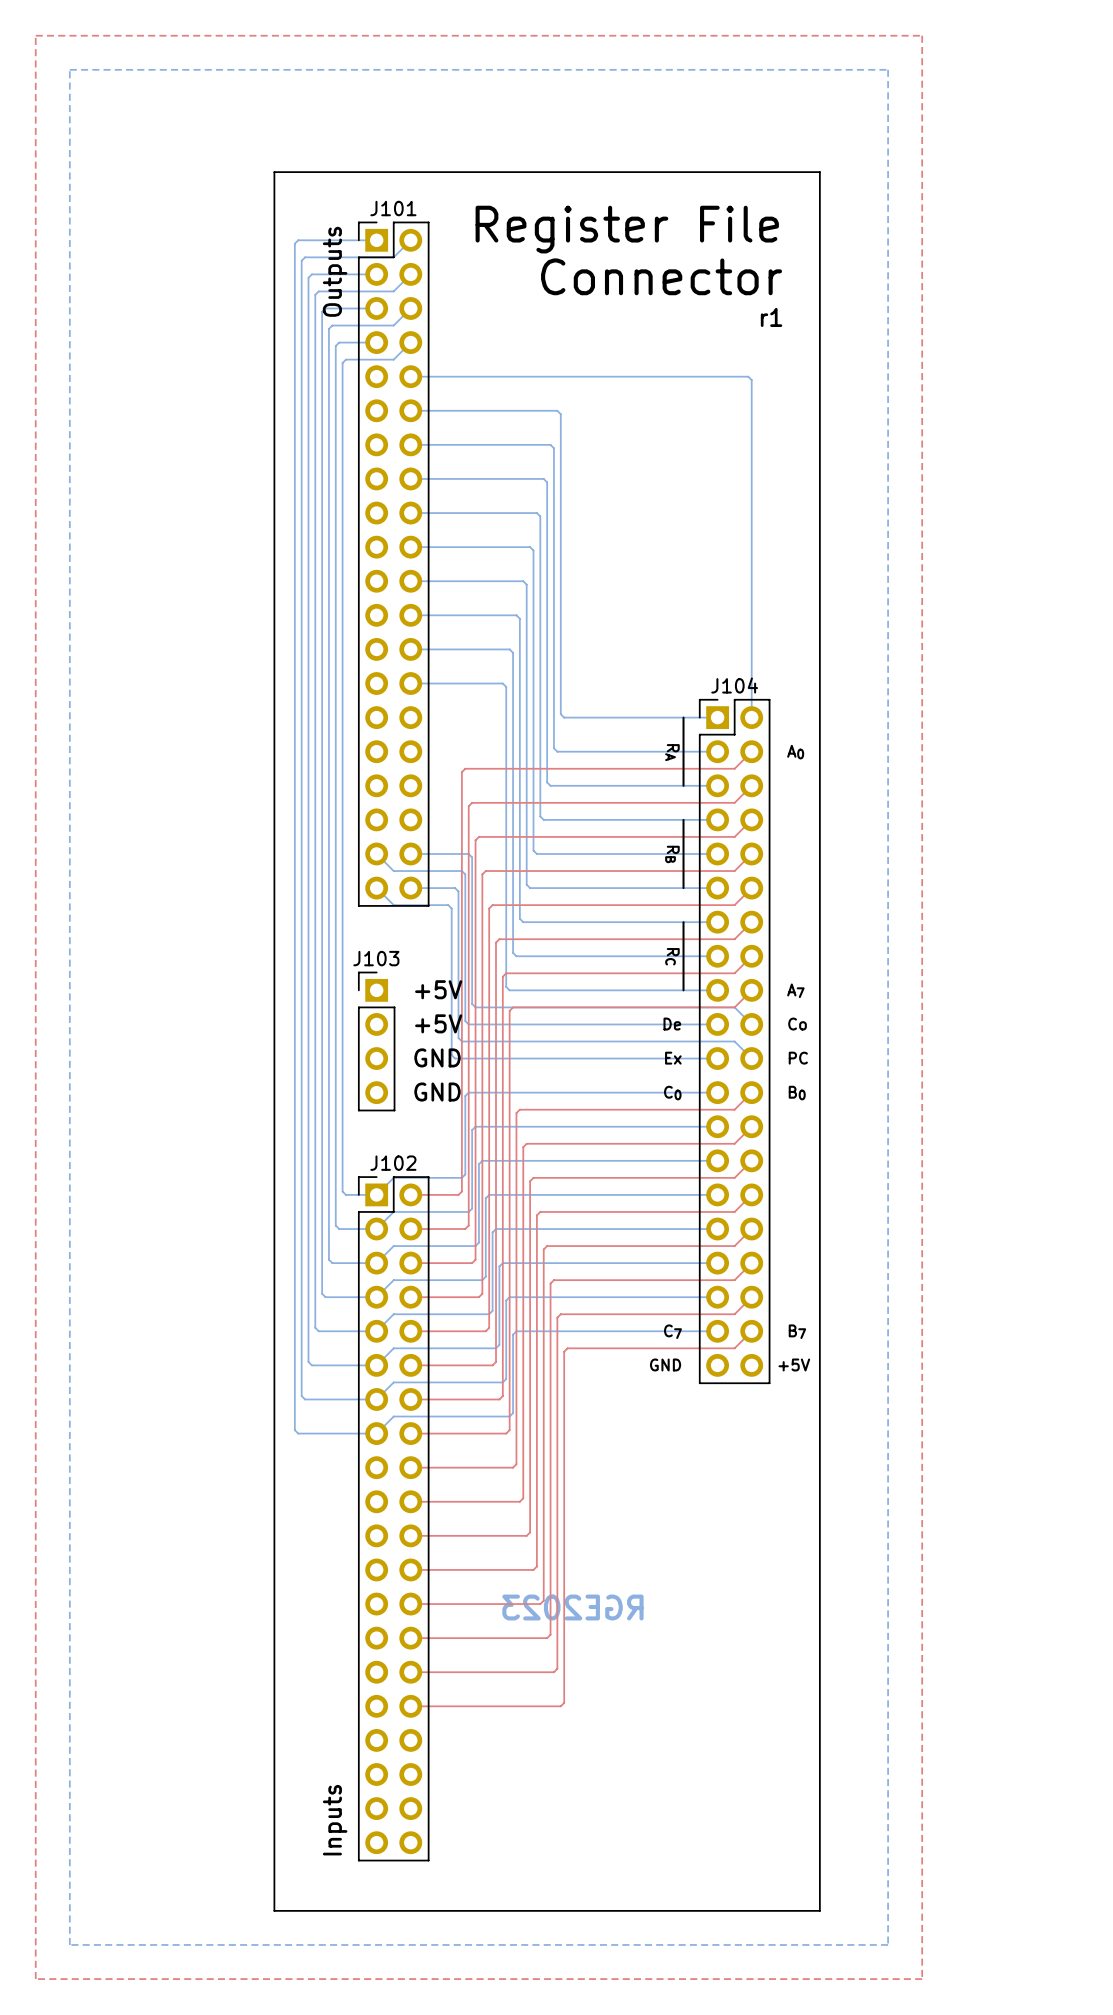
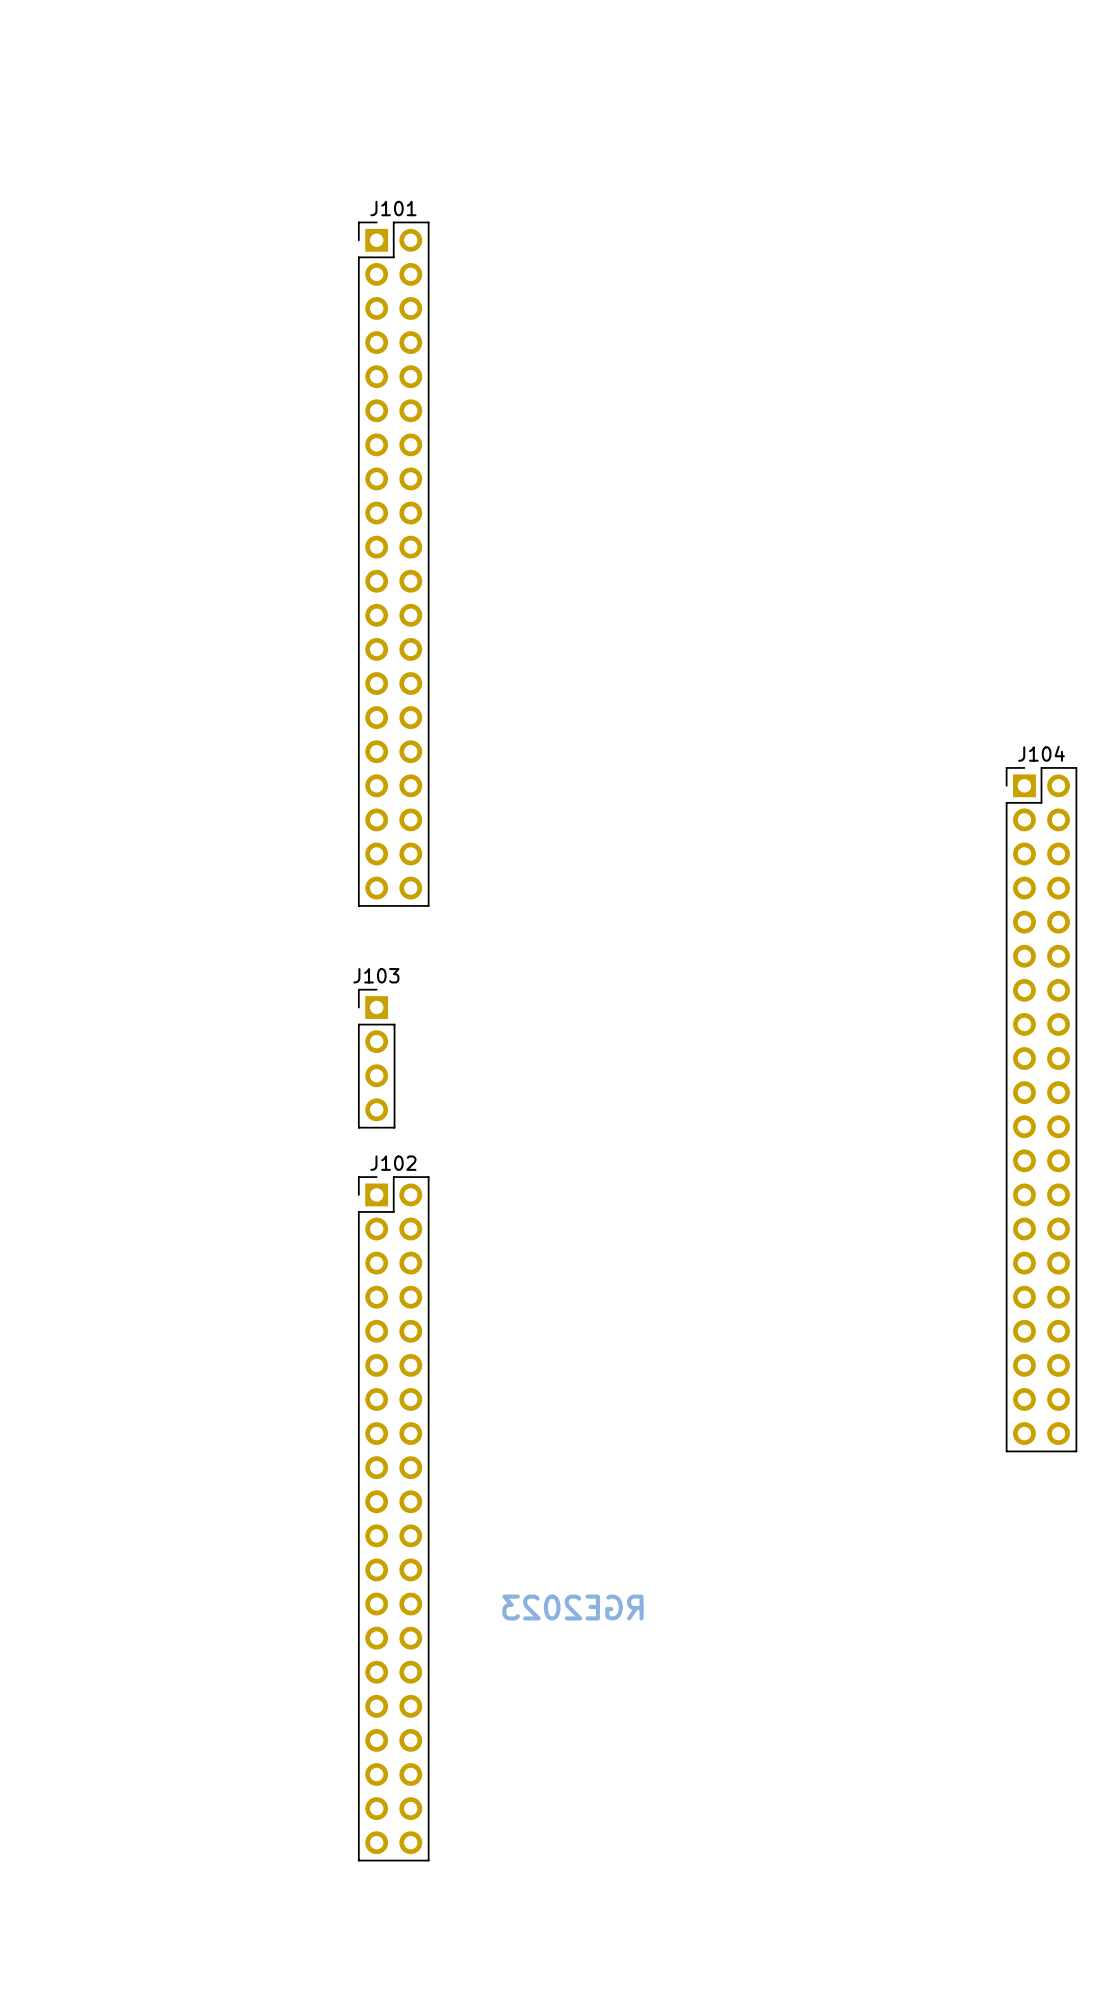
top zone outline: (35, 35) (922, 35) (922, 1979) (35, 1979) (35, 35) -> none
bottom zone outline: (69, 69) (888, 69) (888, 1944) (69, 1944) (69, 69) -> none
board edge: (274, 172) (819, 172) (819, 1910) (274, 1910) (274, 172) -> none
text: Register File (627, 229) -> none
bottom track: (376, 240) (298, 240) (294, 243) (294, 1430) (298, 1433) (376, 1433) (393, 1416) (509, 1416) (513, 1413) (513, 1334) (516, 1331) (717, 1331) -> none
bottom track: (410, 240) (393, 257) (305, 257) (301, 260) (301, 1396) (305, 1399) (376, 1399) (393, 1382) (502, 1382) (506, 1379) (506, 1300) (509, 1297) (717, 1297) -> none
text: Outputs (335, 271) -> none
bottom track: (376, 274) (311, 274) (308, 277) (308, 1361) (311, 1365) (376, 1365) (393, 1348) (496, 1348) (499, 1344) (499, 1266) (502, 1263) (717, 1263) -> none
bottom track: (410, 274) (393, 291) (318, 291) (315, 294) (315, 1327) (318, 1331) (376, 1331) (393, 1314) (489, 1314) (492, 1310) (492, 1232) (496, 1229) (717, 1229) -> none
text: Connector (661, 276) -> none
bottom track: (376, 308) (325, 308) (322, 311) (322, 1293) (325, 1297) (376, 1297) (393, 1280) (482, 1280) (485, 1276) (485, 1198) (489, 1194) (717, 1194) -> none
bottom track: (410, 308) (393, 325) (332, 325) (328, 328) (328, 1259) (332, 1263) (376, 1263) (393, 1246) (475, 1246) (478, 1242) (478, 1164) (482, 1160) (717, 1160) -> none
text: r1 (771, 317) -> none
bottom track: (376, 342) (339, 342) (335, 345) (335, 1225) (339, 1229) (376, 1229) (393, 1211) (468, 1211) (472, 1208) (472, 1130) (475, 1126) (717, 1126) -> none
bottom track: (410, 342) (393, 359) (345, 359) (342, 363) (342, 1191) (345, 1194) (376, 1194) (393, 1177) (461, 1177) (465, 1174) (465, 1096) (468, 1092) (717, 1092) -> none
bottom track: (410, 376) (748, 376) (751, 380) (751, 717) -> none
bottom track: (410, 410) (557, 410) (560, 414) (560, 714) (564, 717) (717, 717) -> none
bottom track: (410, 444) (550, 444) (553, 448) (553, 748) (557, 751) (717, 751) -> none
bottom track: (410, 478) (543, 478) (547, 482) (547, 782) (550, 785) (717, 785) -> none
bottom track: (410, 513) (536, 513) (540, 516) (540, 816) (543, 819) (717, 819) -> none
bottom track: (410, 547) (530, 547) (533, 550) (533, 850) (536, 853) (717, 853) -> none
bottom track: (410, 581) (523, 581) (526, 584) (526, 884) (530, 888) (717, 888) -> none
bottom track: (410, 615) (516, 615) (519, 618) (519, 918) (523, 922) (717, 922) -> none
bottom track: (410, 649) (509, 649) (513, 652) (513, 952) (516, 956) (717, 956) -> none
bottom track: (410, 683) (502, 683) (506, 686) (506, 986) (509, 990) (717, 990) -> none
line: (683, 717) (683, 785) -> none
top track: (751, 751) (734, 768) (465, 768) (461, 772) (461, 1191) (458, 1194) (410, 1194) -> none
text: RA (672, 752) -> none
text: A0 (795, 752) -> none
top track: (751, 785) (734, 802) (472, 802) (468, 806) (468, 1225) (465, 1229) (410, 1229) -> none
line: (683, 819) (683, 888) -> none
top track: (751, 819) (734, 836) (478, 836) (475, 840) (475, 1259) (472, 1263) (410, 1263) -> none
bottom track: (376, 853) (393, 871) (461, 871) (465, 874) (465, 1021) (468, 1024) (717, 1024) -> none
bottom track: (410, 853) (468, 853) (472, 857) (472, 1003) (475, 1007) (734, 1007) (751, 1024) -> none
top track: (751, 853) (734, 871) (485, 871) (482, 874) (482, 1293) (478, 1297) (410, 1297) -> none
text: RB (672, 854) -> none
bottom track: (376, 888) (393, 905) (448, 905) (451, 908) (451, 1055) (455, 1058) (717, 1058) -> none
bottom track: (410, 888) (455, 888) (458, 891) (458, 1038) (461, 1041) (734, 1041) (751, 1058) -> none
top track: (751, 888) (734, 905) (492, 905) (489, 908) (489, 1327) (485, 1331) (410, 1331) -> none
line: (683, 922) (683, 990) -> none
top track: (751, 922) (734, 939) (499, 939) (496, 942) (496, 1361) (492, 1365) (410, 1365) -> none
text: RC (672, 956) -> none
top track: (751, 956) (734, 973) (506, 973) (502, 976) (502, 1396) (499, 1399) (410, 1399) -> none
text: +5V (438, 989) -> none
top track: (751, 990) (734, 1007) (513, 1007) (509, 1010) (509, 1430) (506, 1433) (410, 1433) -> none
text: A7 (795, 990) -> none
text: +5V (438, 1023) -> none
text: De (672, 1024) -> none
text: Co (797, 1024) -> none
J103 position: (376, 1041) -> (376, 1058)
J104 position: (734, 1041) -> (1041, 1109)
text: GND (437, 1057) -> none
text: Ex (673, 1058) -> none
text: PC (798, 1058) -> none
text: GND (437, 1092) -> none
top track: (751, 1092) (734, 1109) (519, 1109) (516, 1113) (516, 1464) (513, 1467) (410, 1467) -> none
text: C0 (672, 1093) -> none
text: B0 (797, 1093) -> none
top track: (751, 1126) (734, 1143) (526, 1143) (523, 1147) (523, 1498) (519, 1501) (410, 1501) -> none
top track: (751, 1160) (734, 1177) (533, 1177) (530, 1181) (530, 1532) (526, 1535) (410, 1535) -> none
top track: (751, 1194) (734, 1211) (540, 1211) (536, 1215) (536, 1566) (533, 1569) (410, 1569) -> none
top track: (751, 1229) (734, 1246) (547, 1246) (543, 1249) (543, 1600) (540, 1604) (410, 1604) -> none
top track: (751, 1263) (734, 1280) (553, 1280) (550, 1283) (550, 1634) (547, 1638) (410, 1638) -> none
top track: (751, 1297) (734, 1314) (560, 1314) (557, 1317) (557, 1668) (553, 1672) (410, 1672) -> none
text: C7 (672, 1331) -> none
top track: (751, 1331) (734, 1348) (567, 1348) (564, 1351) (564, 1702) (560, 1706) (410, 1706) -> none
text: B7 (797, 1331) -> none
text: GND (665, 1364) -> none
text: +5V (794, 1364) -> none
text: Inputs (335, 1820) -> none

